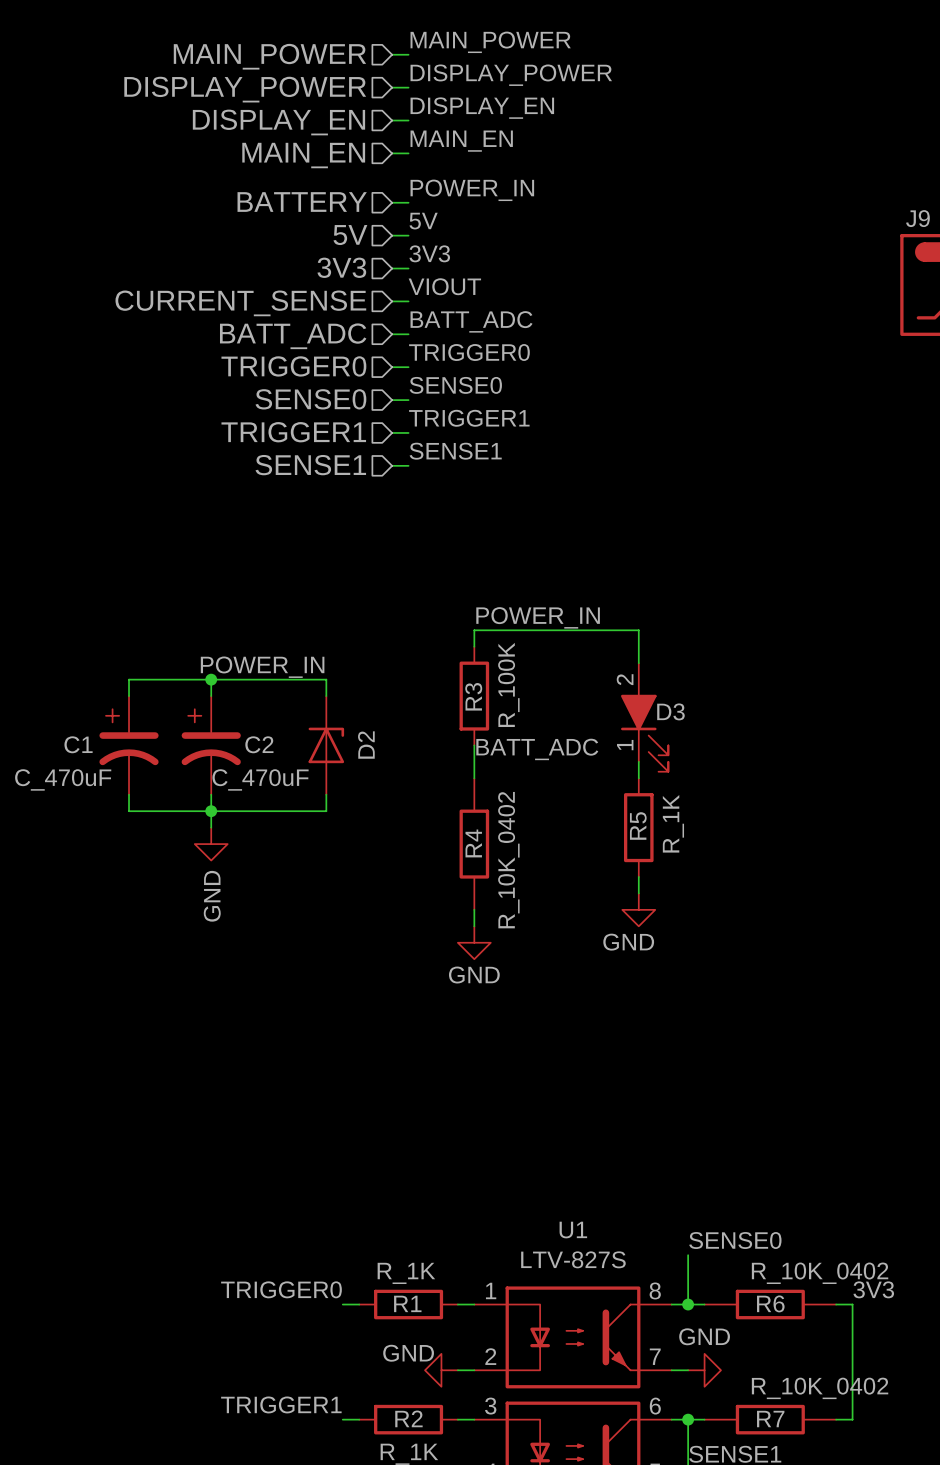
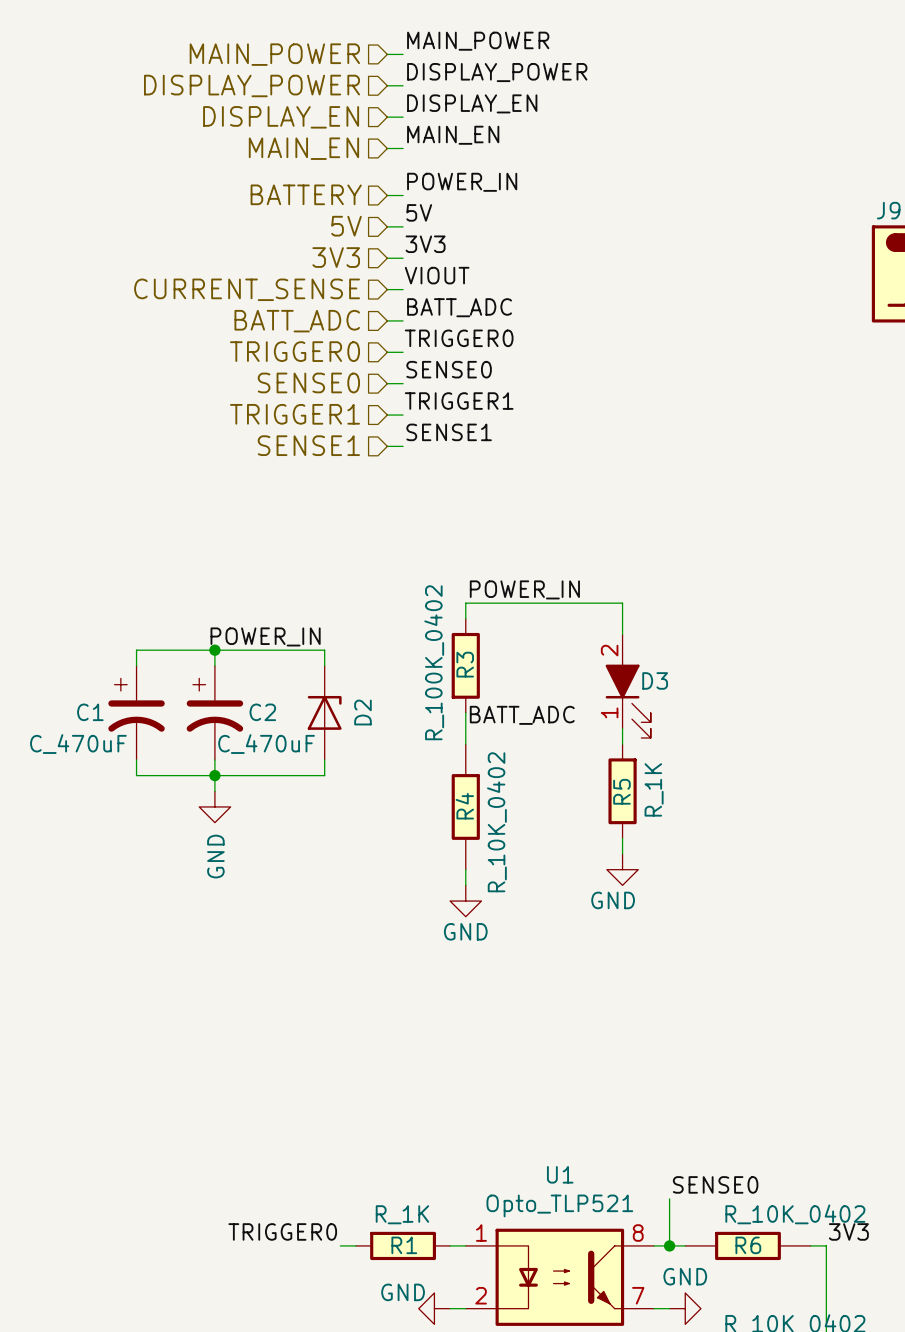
R3 value: R_100K (508, 684) -> R_100K_0402 (434, 662)
U1 value: LTV-827S (573, 1259) -> Opto_TLP521 (559, 1205)

